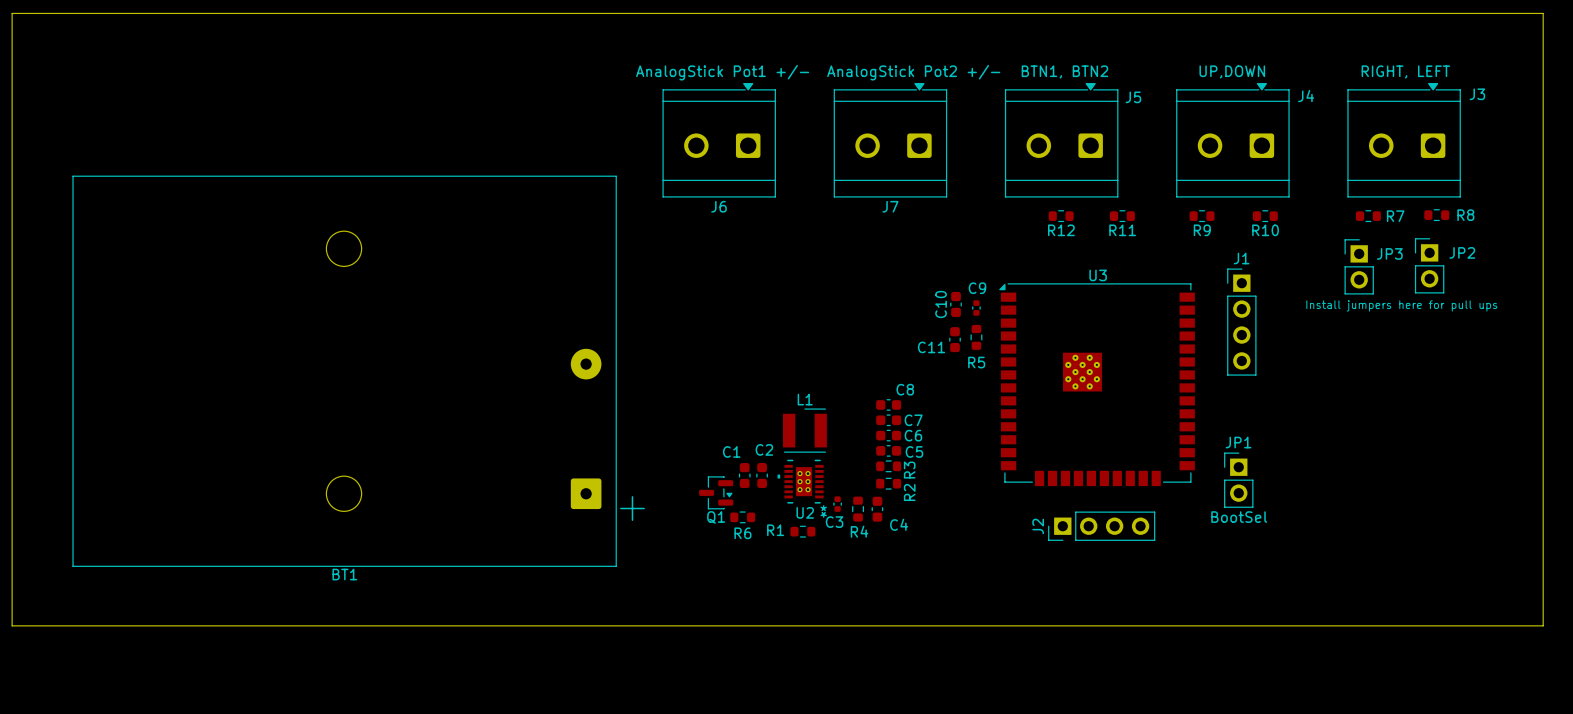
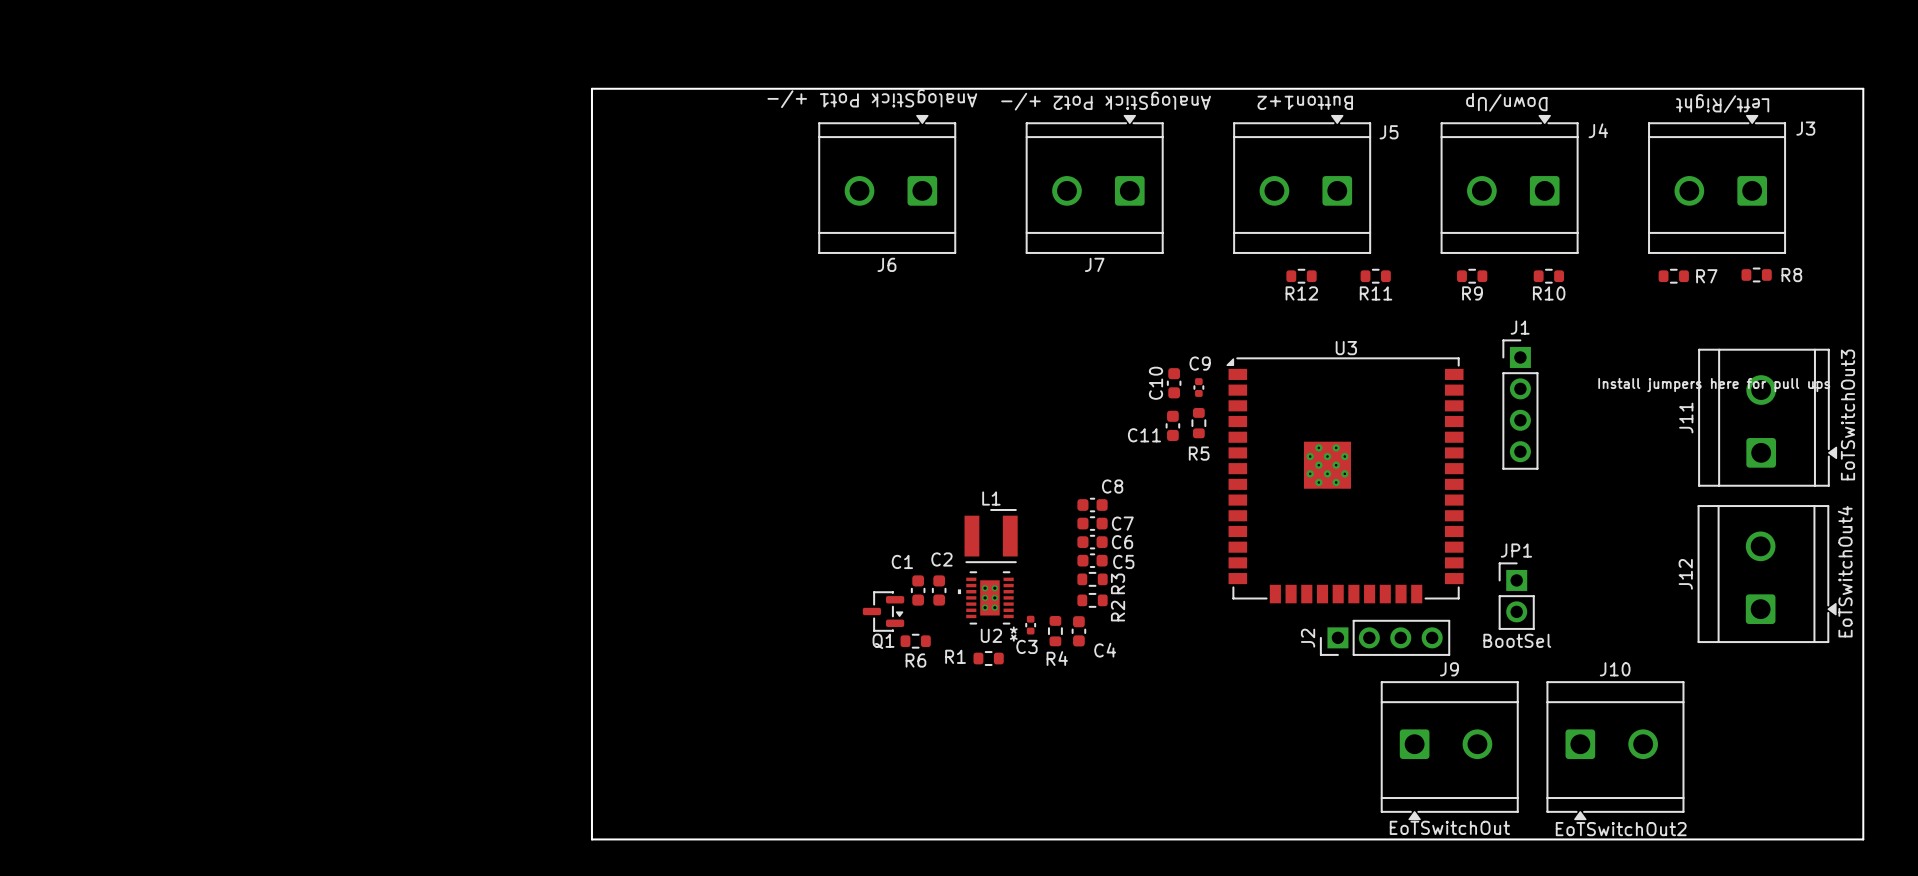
board edge: (12, 13) (1543, 13) (1543, 625) (12, 625) (12, 13) -> (591, 88) (591, 839) (1863, 839) (1863, 88) (591, 88)
J5 value: BTN1, BTN2 (1064, 71) -> Button1+2 (1305, 102)
J4 value: UP,DOWN (1232, 71) -> Down/Up (1506, 102)
J3 value: RIGHT, LEFT (1405, 71) -> Left/Right (1722, 103)
J6 value rotation: 0° (722, 72) -> 180° (872, 98)
J7 value rotation: 0° (913, 72) -> 180° (1106, 101)
JP2: (1429, 265) -> none
JP3: (1359, 266) -> none
J11: none -> EoTSwitchOut3 (1767, 417)
BT1: (344, 371) -> none
J12: none -> EoTSwitchOut4 (1767, 574)
J2 position: (1101, 526) -> (1385, 637)
J9: none -> EoTSwitchOut (1449, 750)
J10: none -> EoTSwitchOut2 (1615, 750)

